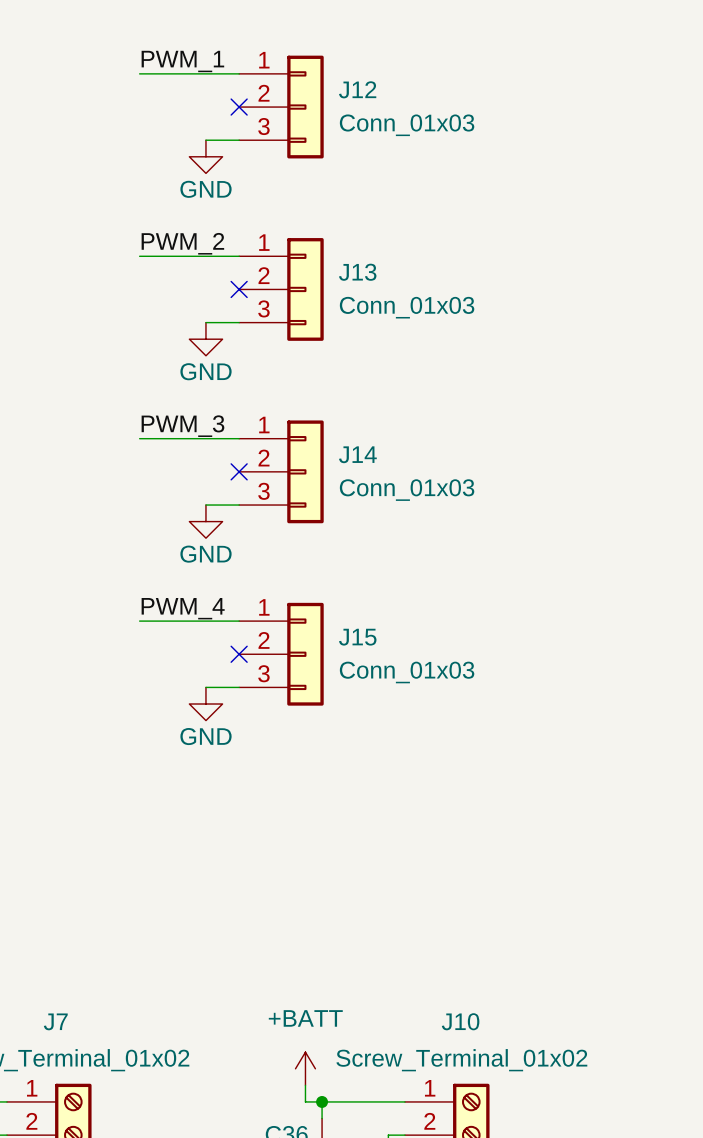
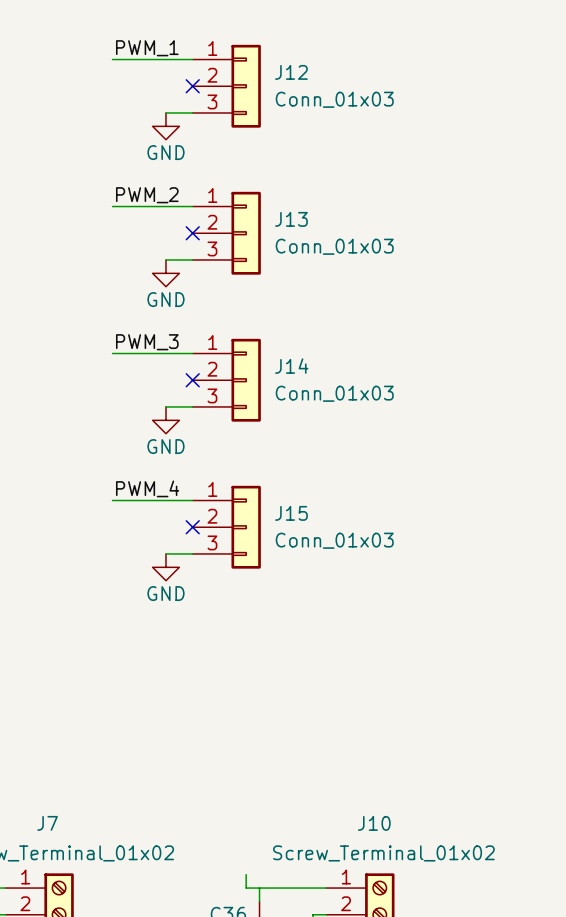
power symbol: +BATT (305, 1068) -> none
junction: (322, 1101) -> none

